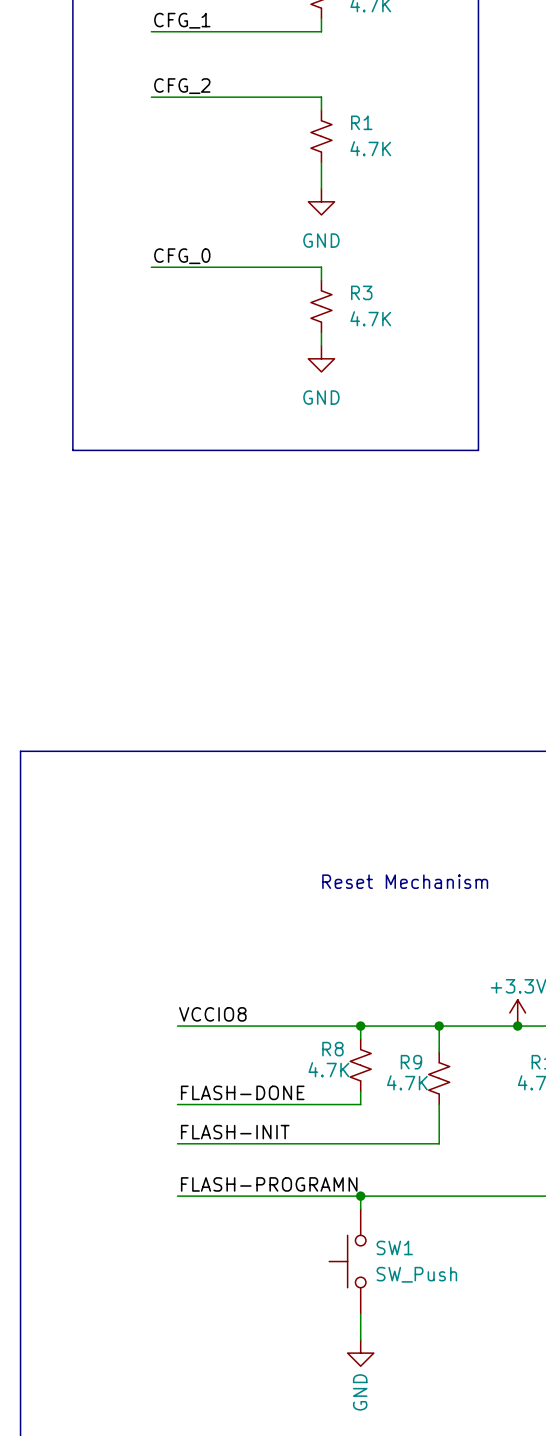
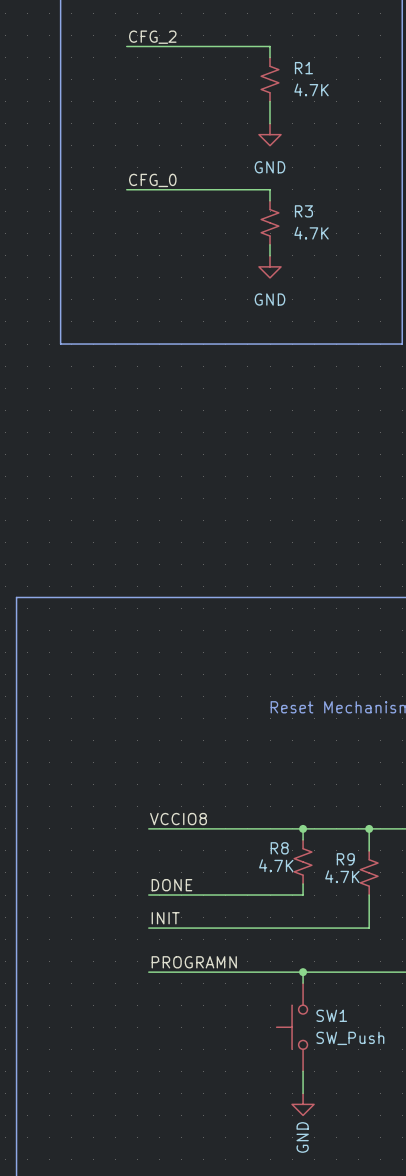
label: FLASH-DONE (242, 1092) -> DONE (171, 885)
label: FLASH-INIT (235, 1132) -> INIT (165, 918)
label: FLASH-PROGRAMN (269, 1184) -> PROGRAMN (194, 962)

